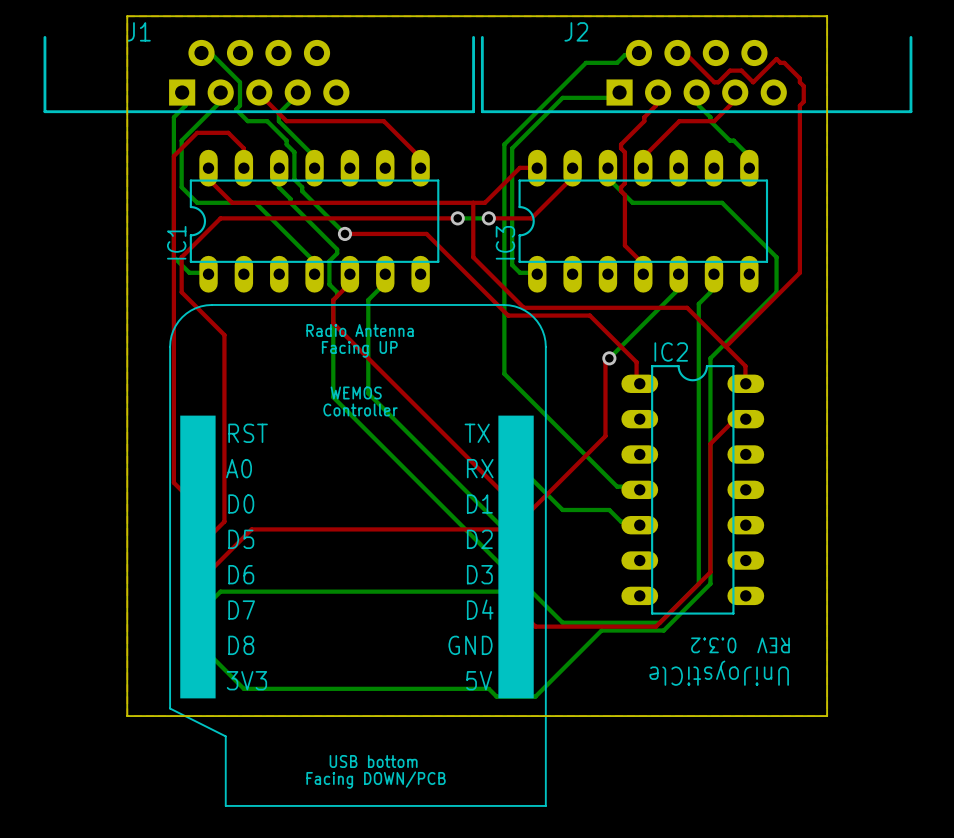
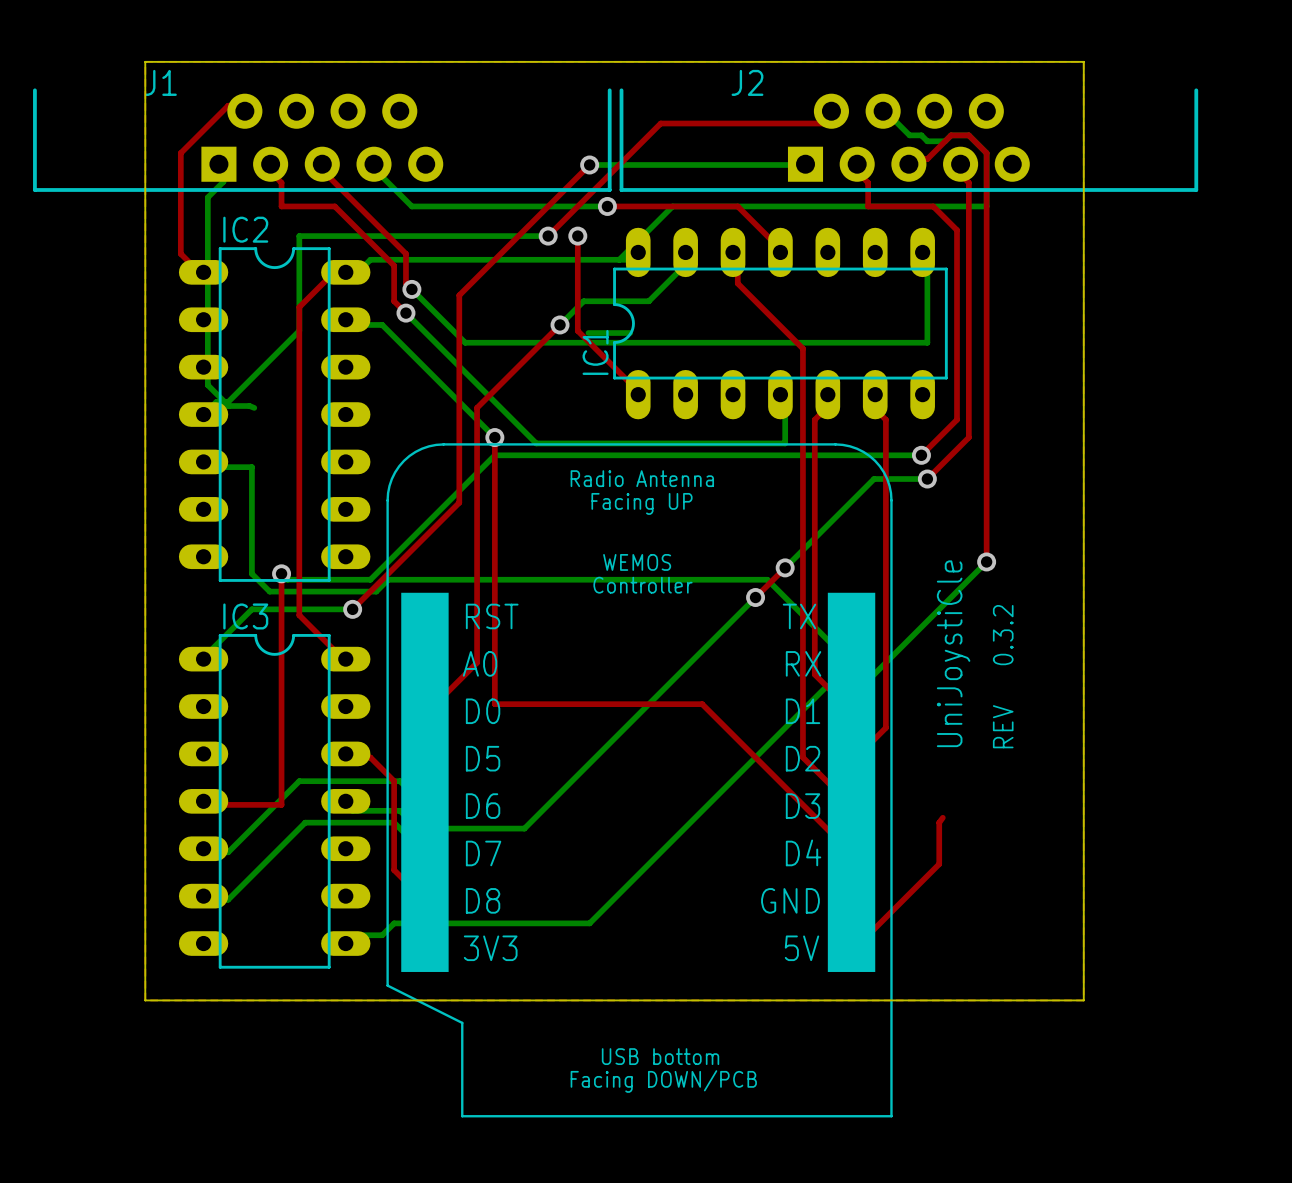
top track: none -> (244, 111) (240, 105) (228, 105) (180, 153) (180, 253) (198, 271) (203, 272)
bottom track: (201, 52) (212, 55) (239, 82) (239, 105) (236, 109) (247, 121) (267, 121) (286, 140) (286, 144) (294, 152) (294, 179) (302, 187) (302, 191) (344, 233) -> none
top track: none -> (831, 111) (826, 111) (826, 123) (660, 123) (548, 236)
bottom track: (638, 52) (636, 55) (624, 55) (617, 62) (586, 62) (504, 144) (504, 373) (617, 486) (636, 486) (639, 489) -> none
top track: (677, 52) (679, 55) (687, 55) (714, 82) (718, 82) (729, 70) (741, 70) (753, 82) (776, 58) (780, 62) (784, 62) (799, 78) (799, 82) (803, 86) (803, 101) (799, 105) (799, 272) (726, 346) -> none
bottom track: none -> (883, 111) (885, 111) (909, 135) (921, 135) (927, 141) (945, 141) (951, 135) (968, 135) (986, 153) (986, 206) (672, 206) (619, 259)
top track: none -> (270, 164) (275, 164) (275, 176) (281, 182) (281, 206) (334, 206) (394, 265) (394, 301) (405, 313)
bottom track: (220, 92) (220, 101) (181, 140) (181, 187) (197, 202) (255, 202) (313, 261) (314, 274) -> none
top track: (259, 92) (286, 121) (383, 121) (418, 156) (418, 167) (420, 168) -> (322, 164) (323, 170) (405, 253) (405, 283) (411, 289)
bottom track: (297, 92) (278, 113) (278, 121) (313, 156) (314, 168) -> (374, 164) (370, 164) (411, 206) (607, 206)
bottom track: (619, 92) (613, 97) (562, 97) (512, 148) (512, 265) (519, 272) (537, 274) -> (805, 164) (589, 164)
top track: (658, 92) (656, 93) (656, 105) (644, 117) (644, 121) (621, 144) (621, 148) (624, 152) (624, 183) (621, 187) (621, 191) (624, 195) (624, 245) (640, 261) (640, 272) (643, 274) -> (857, 164) (862, 164) (862, 176) (868, 182) (868, 206) (933, 206) (957, 230) (957, 419) (921, 455)
top track: none -> (908, 164) (909, 159) (927, 159) (951, 135) (968, 135) (986, 153) (986, 561)
bottom track: (696, 92) (698, 93) (698, 105) (710, 117) (710, 121) (749, 156) (749, 168) -> none
top track: (735, 92) (733, 101) (714, 121) (679, 121) (644, 156) (643, 168) -> (960, 164) (962, 164) (962, 176) (968, 182) (968, 437) (927, 479)
top track: none -> (589, 164) (459, 295) (459, 502) (352, 609)
via: none -> (589, 164)
top track: none -> (607, 206) (737, 206) (779, 247) (780, 252)
via: none -> (607, 206)
bottom track: none -> (548, 236) (299, 236) (299, 330) (228, 401) (216, 401) (203, 414)
via: none -> (548, 236)
top track: none -> (577, 236) (577, 330) (637, 390) (638, 394)
via: none -> (577, 236)
bottom track: none -> (638, 252) (631, 259) (370, 259) (358, 271) (345, 272)
bottom track: none -> (685, 252) (684, 265) (648, 301) (583, 301) (560, 324)
top track: none -> (733, 252) (737, 253) (737, 283) (802, 348) (802, 757) (851, 806)
bottom track: none -> (922, 252) (927, 253) (927, 342) (465, 342) (411, 289)
top track: (208, 168) (208, 179) (232, 202) (484, 202) (519, 167) (537, 168) -> none
top track: (243, 168) (243, 148) (228, 132) (197, 132) (173, 156) (173, 482) (193, 502) (197, 503) -> none
bottom track: (279, 168) (278, 187) (290, 198) (290, 202) (337, 249) (337, 253) (329, 261) (329, 284) (337, 292) (337, 296) (333, 300) (333, 397) (508, 572) (516, 572) (516, 574) -> none
top track: (572, 168) (570, 179) (531, 218) (488, 218) -> none
bottom track: (607, 168) (609, 179) (632, 202) (722, 202) (776, 257) (776, 292) (710, 358) (710, 583) (663, 630) (601, 630) (535, 696) (496, 696) (488, 688) (243, 688) (201, 646) (197, 645) -> none
top track: none -> (345, 272) (340, 277) (328, 277) (299, 307) (299, 615) (340, 656) (345, 659)
via: none -> (411, 289)
top track: (473, 202) (473, 257) (523, 307) (687, 307) (745, 366) (745, 383) -> none
bottom track: none -> (405, 313) (536, 443) (785, 443) (785, 396) (780, 394)
via: none -> (405, 313)
bottom track: none -> (345, 319) (346, 324) (382, 324) (494, 437)
top track: none -> (560, 324) (477, 407) (477, 662) (429, 710) (424, 711)
top track: (457, 218) (220, 218) (181, 257) (181, 292) (224, 335) (224, 521) (208, 537) (197, 539) -> none
via position: (457, 218) -> (560, 324)
via: (488, 218) -> none
IC1 position: (314, 221) -> (780, 323)
IC3 rotation: 0° (643, 221) -> 90° clockwise (274, 801)
IC3 position: (643, 221) -> (274, 801)
top track: (344, 233) (426, 233) (508, 315) (589, 315) (636, 362) (636, 381) (639, 383) -> none
via: (344, 233) -> none
top track: none -> (827, 394) (826, 407) (814, 419) (814, 674) (851, 711)
top track: none -> (875, 394) (879, 396) (879, 413) (885, 419) (885, 727) (856, 757) (851, 758)
top track: (349, 274) (348, 284) (333, 300) (333, 323) (516, 503) -> none
bottom track: (385, 274) (383, 284) (368, 300) (368, 393) (512, 537) (516, 537) (516, 539) -> none
bottom track: (678, 274) (675, 276) (675, 292) (609, 358) -> none
bottom track: (713, 274) (710, 276) (710, 292) (698, 303) (698, 583) (659, 622) (562, 622) (527, 587) (523, 591) (220, 591) (205, 607) (197, 610) -> none
top track: none -> (494, 437) (494, 704) (702, 704) (851, 853)
via: none -> (494, 437)
bottom track: none -> (921, 455) (494, 455) (370, 579) (287, 579) (281, 573)
via: none -> (921, 455)
bottom track: none -> (203, 461) (204, 467) (251, 467) (251, 573) (269, 591) (376, 591) (388, 579) (767, 579) (851, 663)
bottom track: none -> (927, 479) (874, 479) (785, 567)
via: none -> (927, 479)
top track: (609, 358) (605, 362) (605, 436) (519, 521) (512, 521) (504, 529) (251, 529) (208, 572) (201, 572) (197, 574) -> none
via: (609, 358) -> none
bottom track: none -> (986, 561) (862, 686) (826, 686) (589, 923) (394, 923) (382, 935) (352, 935) (345, 943)
via: none -> (986, 561)
top track: none -> (785, 567) (755, 597)
via: none -> (785, 567)
top track: none -> (281, 573) (281, 804) (204, 804) (203, 801)
via: none -> (281, 573)
bottom track: none -> (755, 597) (524, 828) (417, 828) (400, 810) (352, 810) (345, 801)
via: none -> (755, 597)
top track: (745, 419) (733, 420) (710, 443) (710, 572) (656, 626) (535, 626) (519, 611) (516, 610) -> none
bottom track: none -> (352, 609) (251, 609) (203, 659)
via: none -> (352, 609)
bottom track: (516, 468) (516, 471) (523, 471) (562, 509) (609, 509) (621, 521) (636, 521) (639, 525) -> none
IC2 position: (692, 489) -> (274, 414)
top track: none -> (345, 753) (346, 757) (370, 757) (394, 781) (394, 870) (424, 900)
part position: (357, 555) -> (639, 780)
bottom track: none -> (424, 806) (400, 781) (299, 781) (228, 852) (204, 852) (203, 848)
top track: none -> (942, 817) (939, 822) (939, 864) (856, 947) (851, 948)
bottom track: none -> (424, 853) (394, 822) (305, 822) (228, 899) (204, 899) (203, 896)
text rotation: 0° (713, 645) -> 90° clockwise (1003, 635)
text position: 0.3.2 (713, 645) -> 0.3.2 (1003, 635)
text rotation: 0° (773, 645) -> 90° clockwise (1003, 726)
text position: REV (773, 645) -> REV (1003, 726)
text rotation: 0° (719, 673) -> 90° clockwise (953, 653)
text position: UniJoystiCle (719, 673) -> UniJoystiCle (953, 653)

